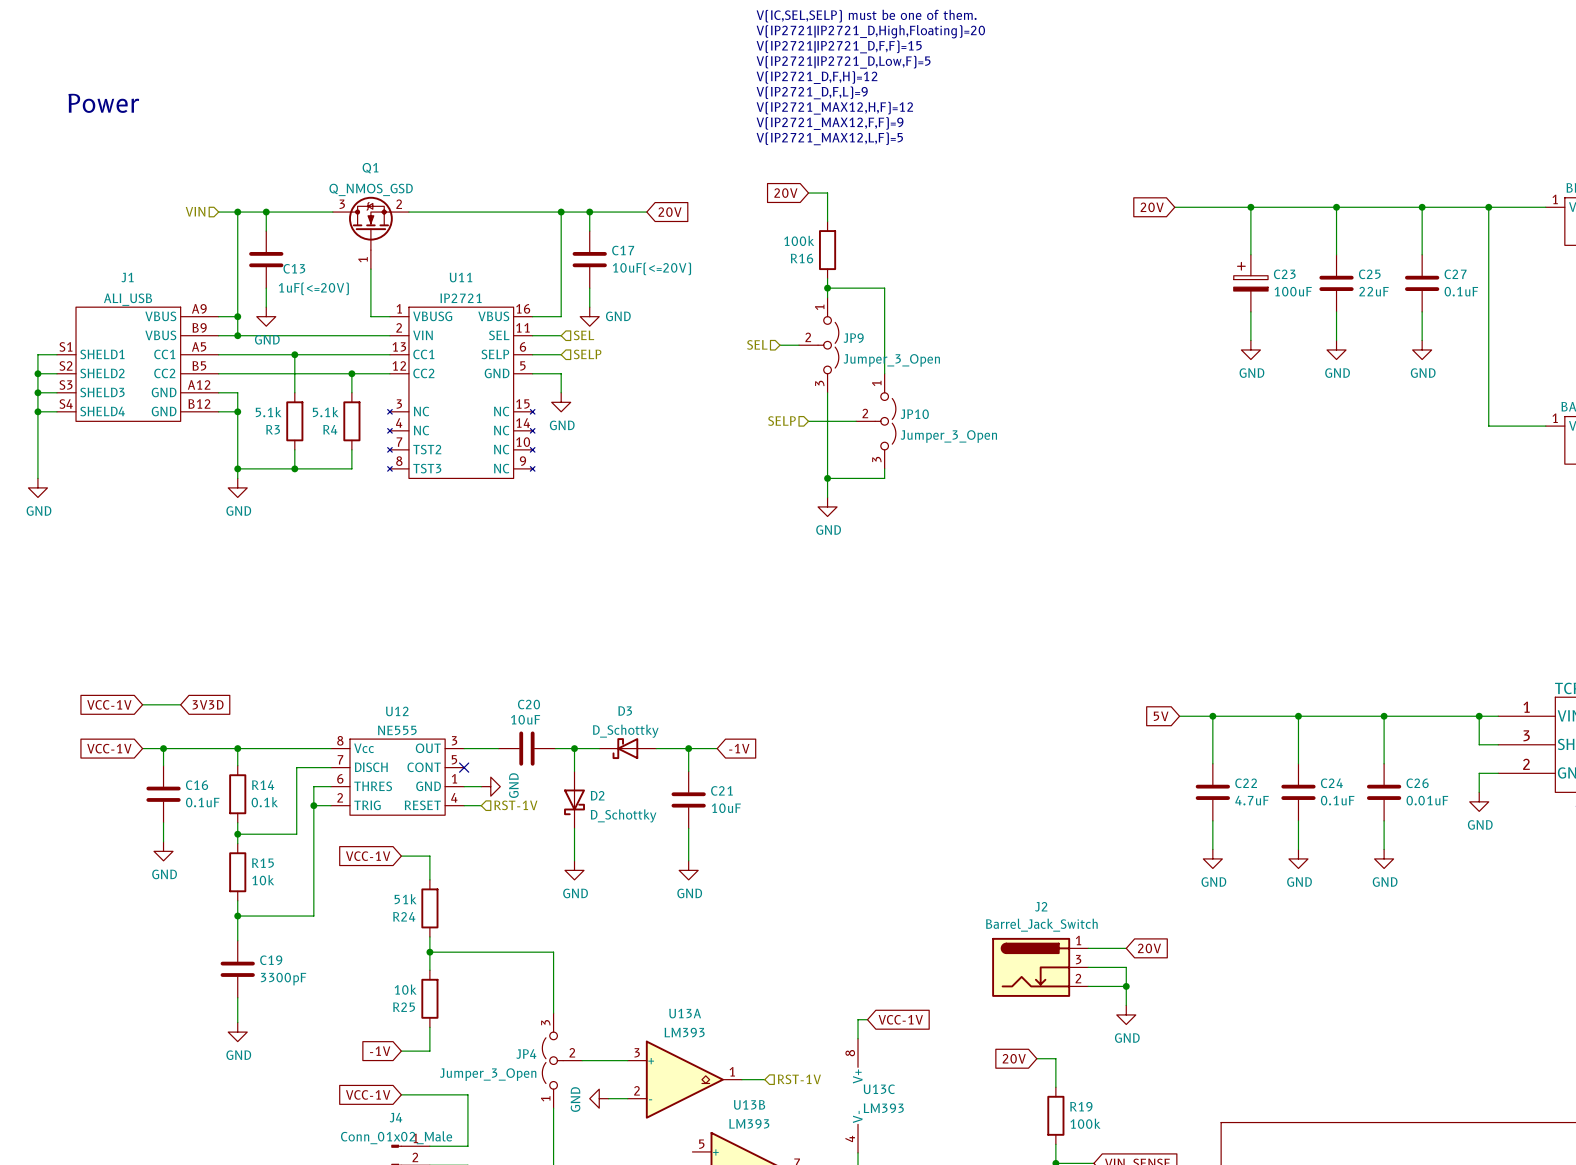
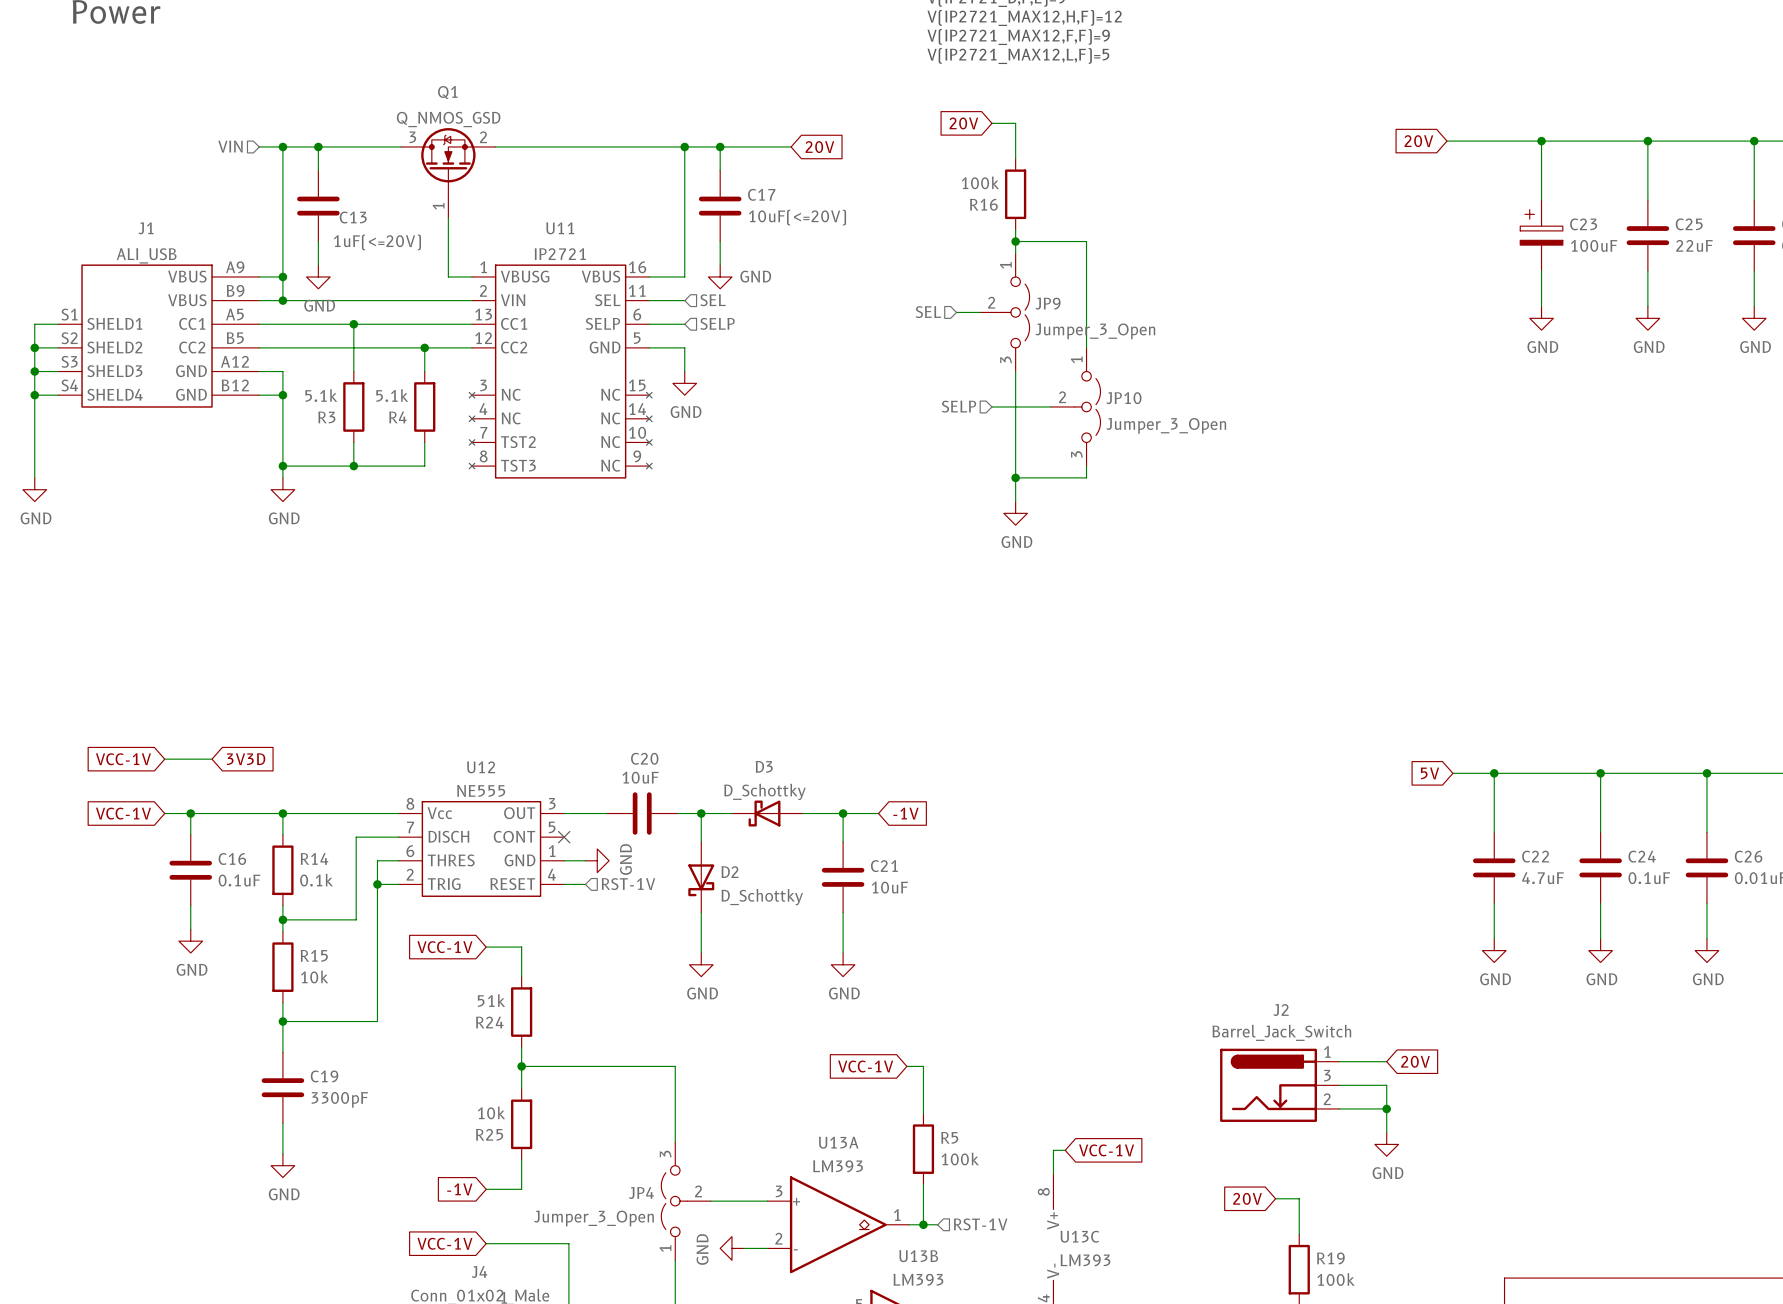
global label: none -> VCC-1V (865, 1066)
wire: none -> (906, 1066) (923, 1066) (923, 1113)
R5: none -> 100k (923, 1149)
wire: none -> (923, 1184) (923, 1224)
junction: none -> (923, 1224)

